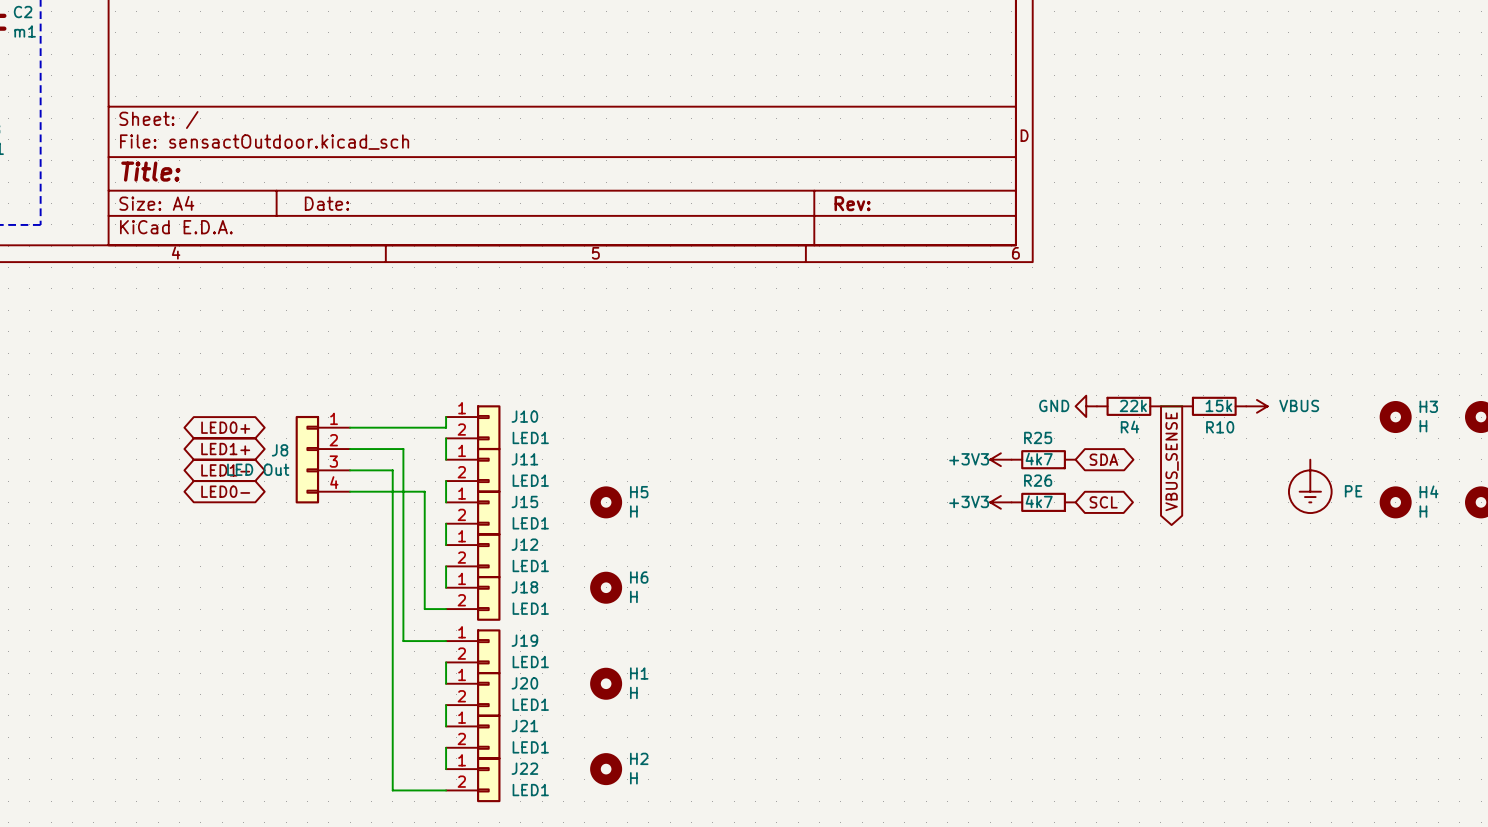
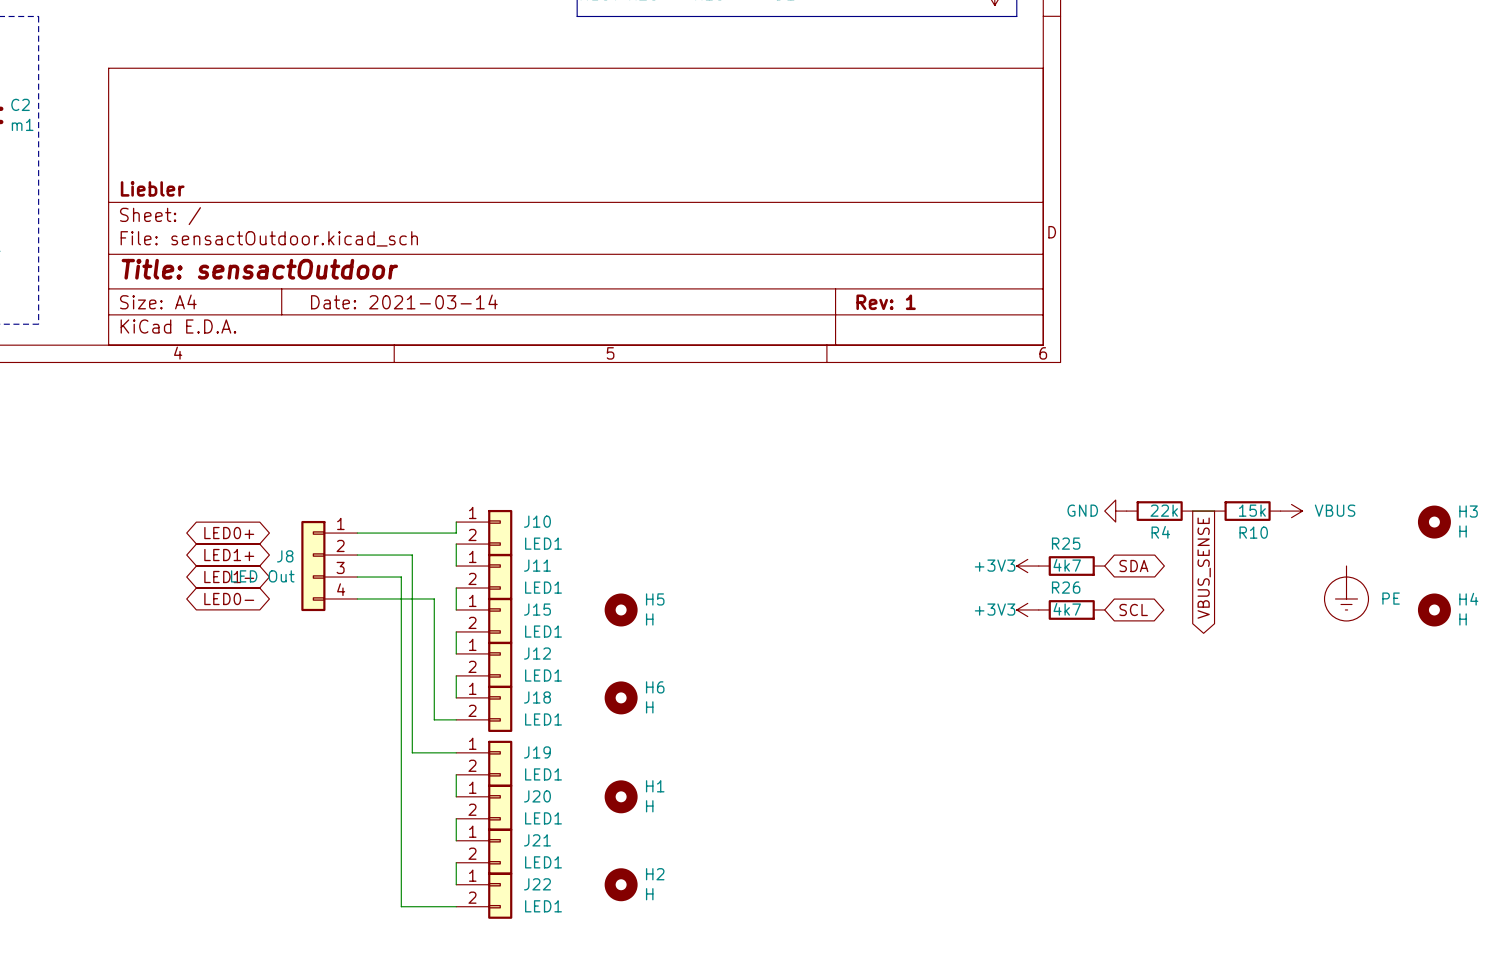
title block: none -> Liebler (152, 188)
title block: Title: (150, 171) -> Title: sensactOutdoor (259, 269)
title block: Date: (326, 203) -> Date: 2021-03-14 (404, 301)
title block: Rev: (852, 203) -> Rev: 1 (886, 302)

